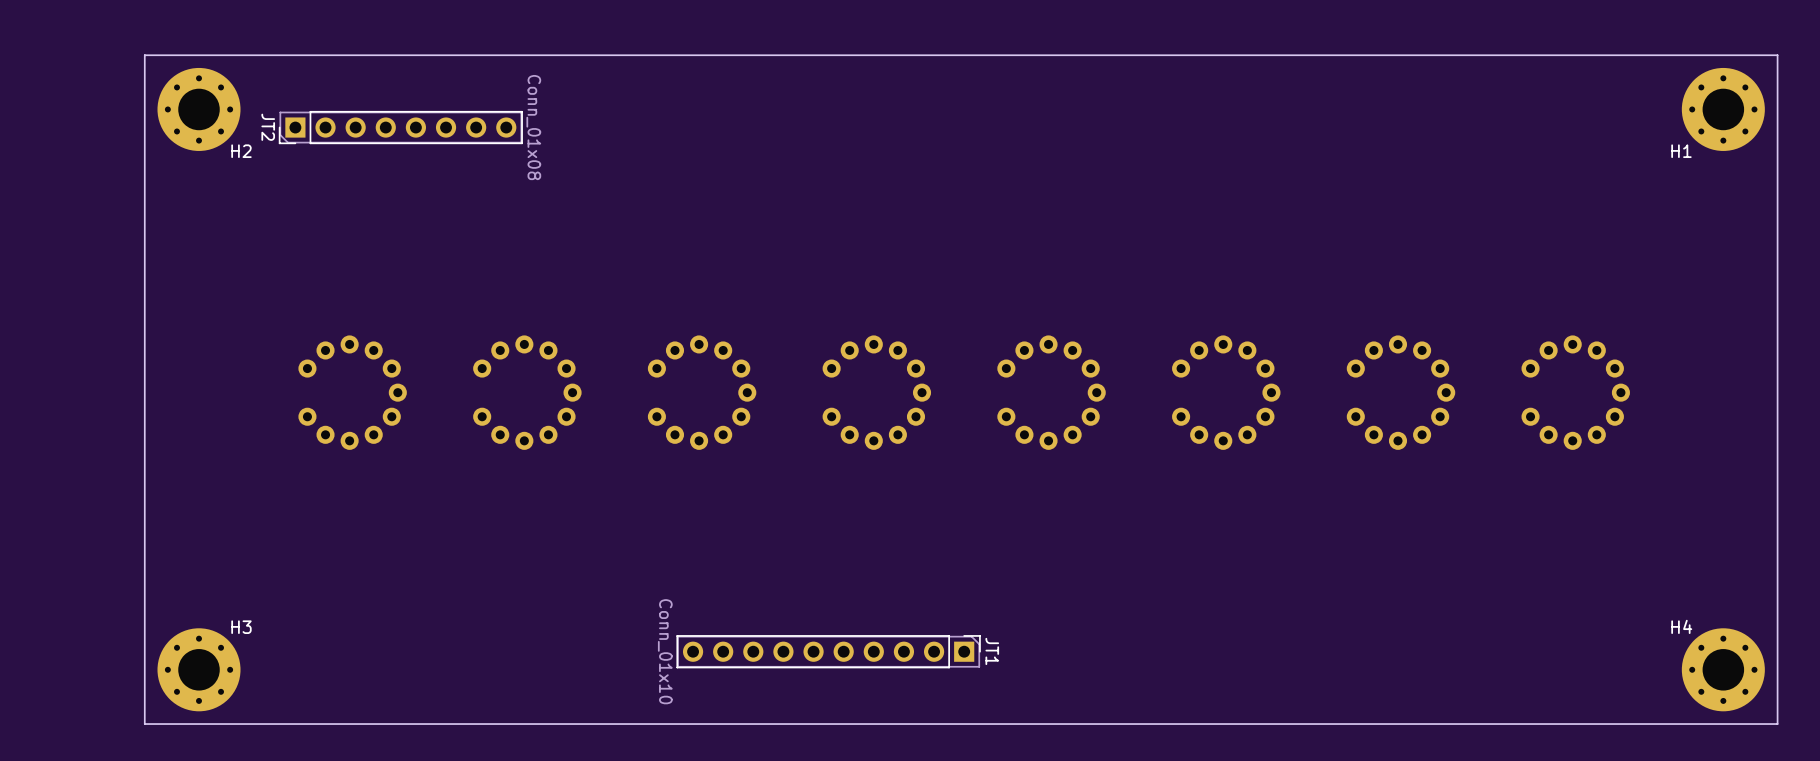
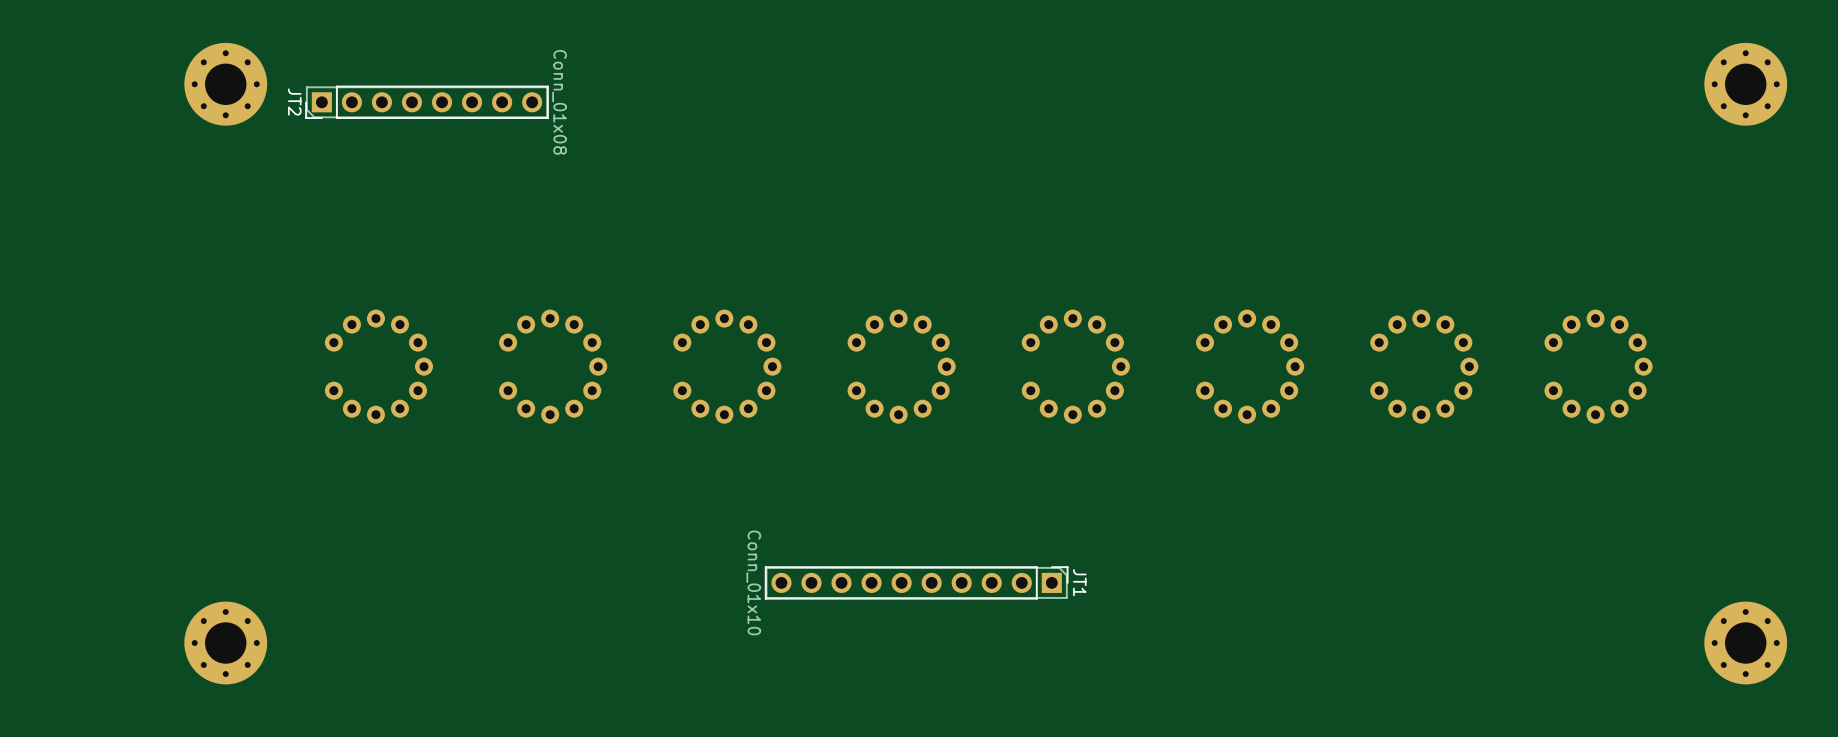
board edge: (1777, 55) (144, 55) (144, 724) (1777, 724) (1777, 55) -> none
H2 name: H2 (241, 151) -> none
H1 name: H1 (1681, 151) -> none
H4 name: H4 (1681, 626) -> none
H3 name: H3 (241, 627) -> none
JT1 position: (828, 651) -> (916, 582)

